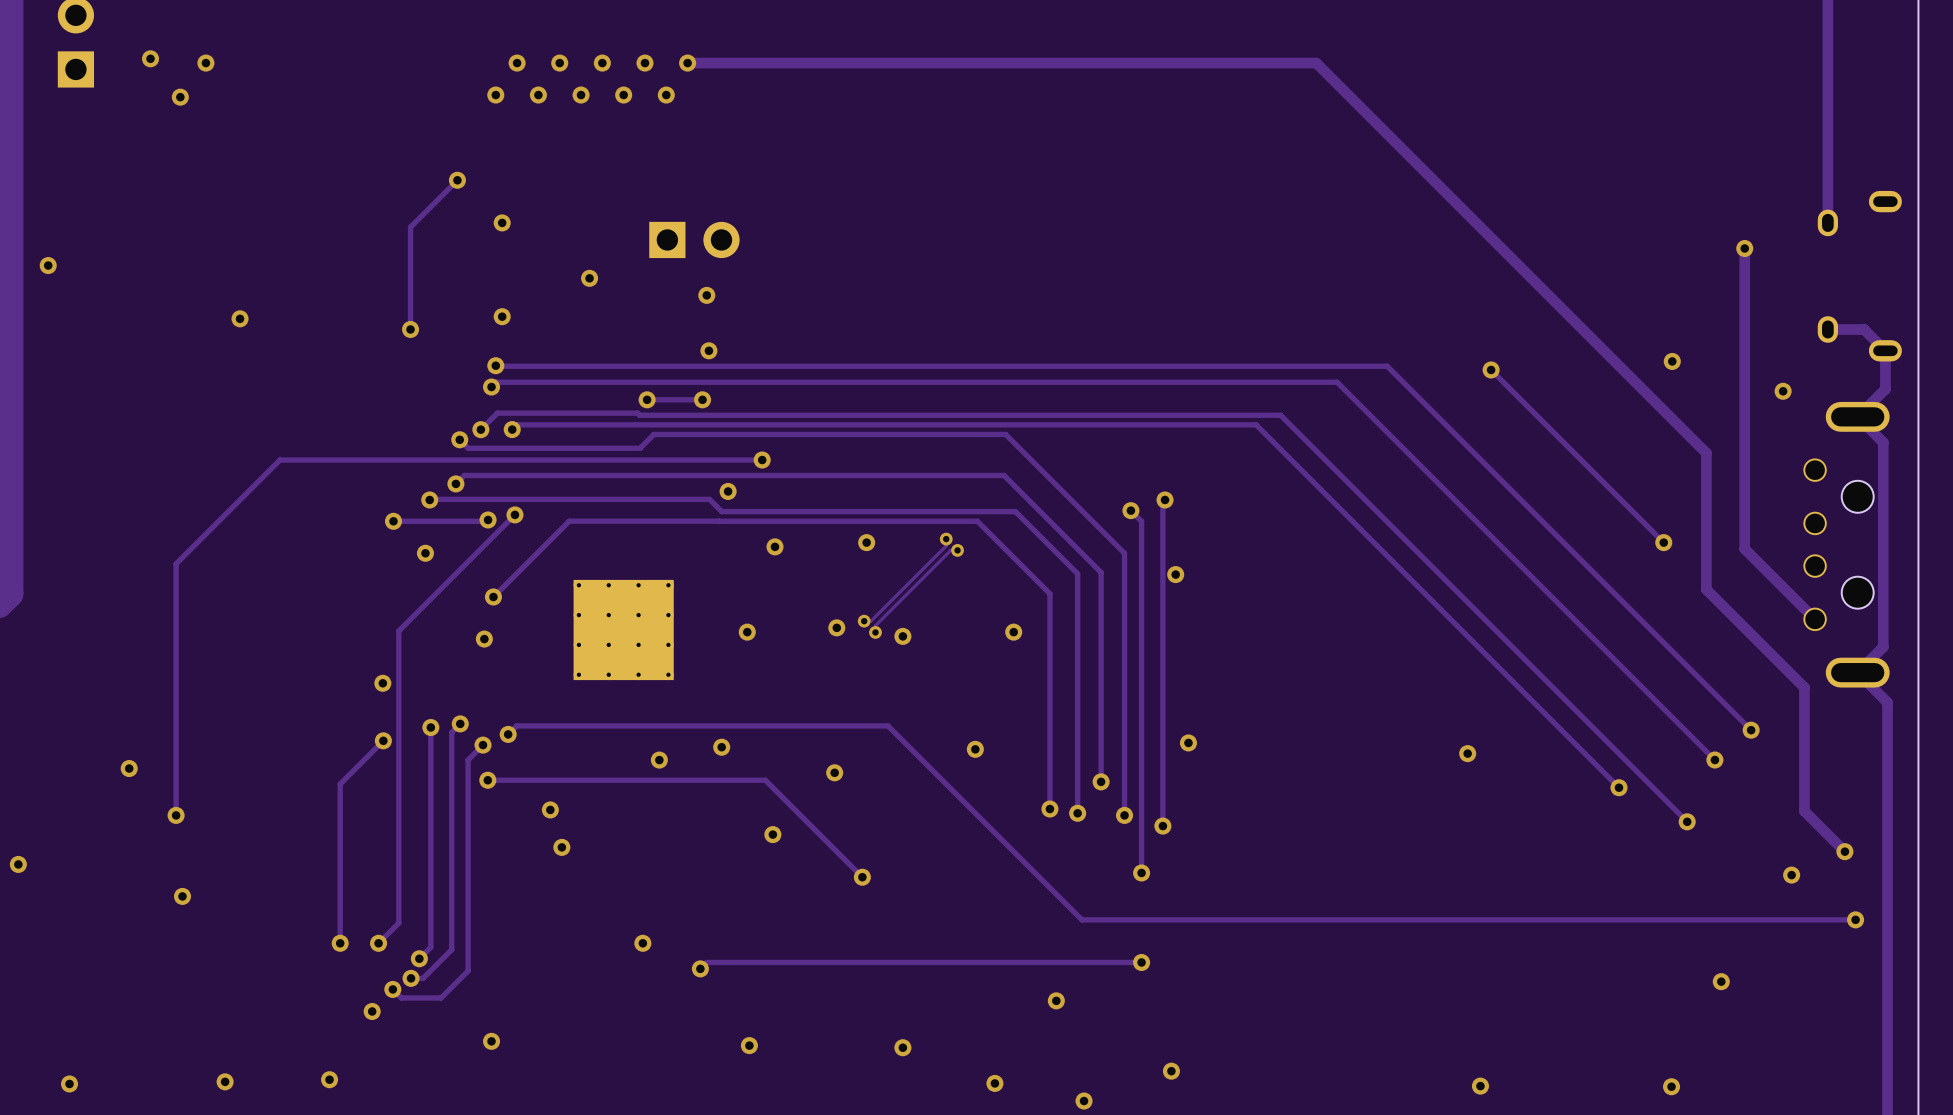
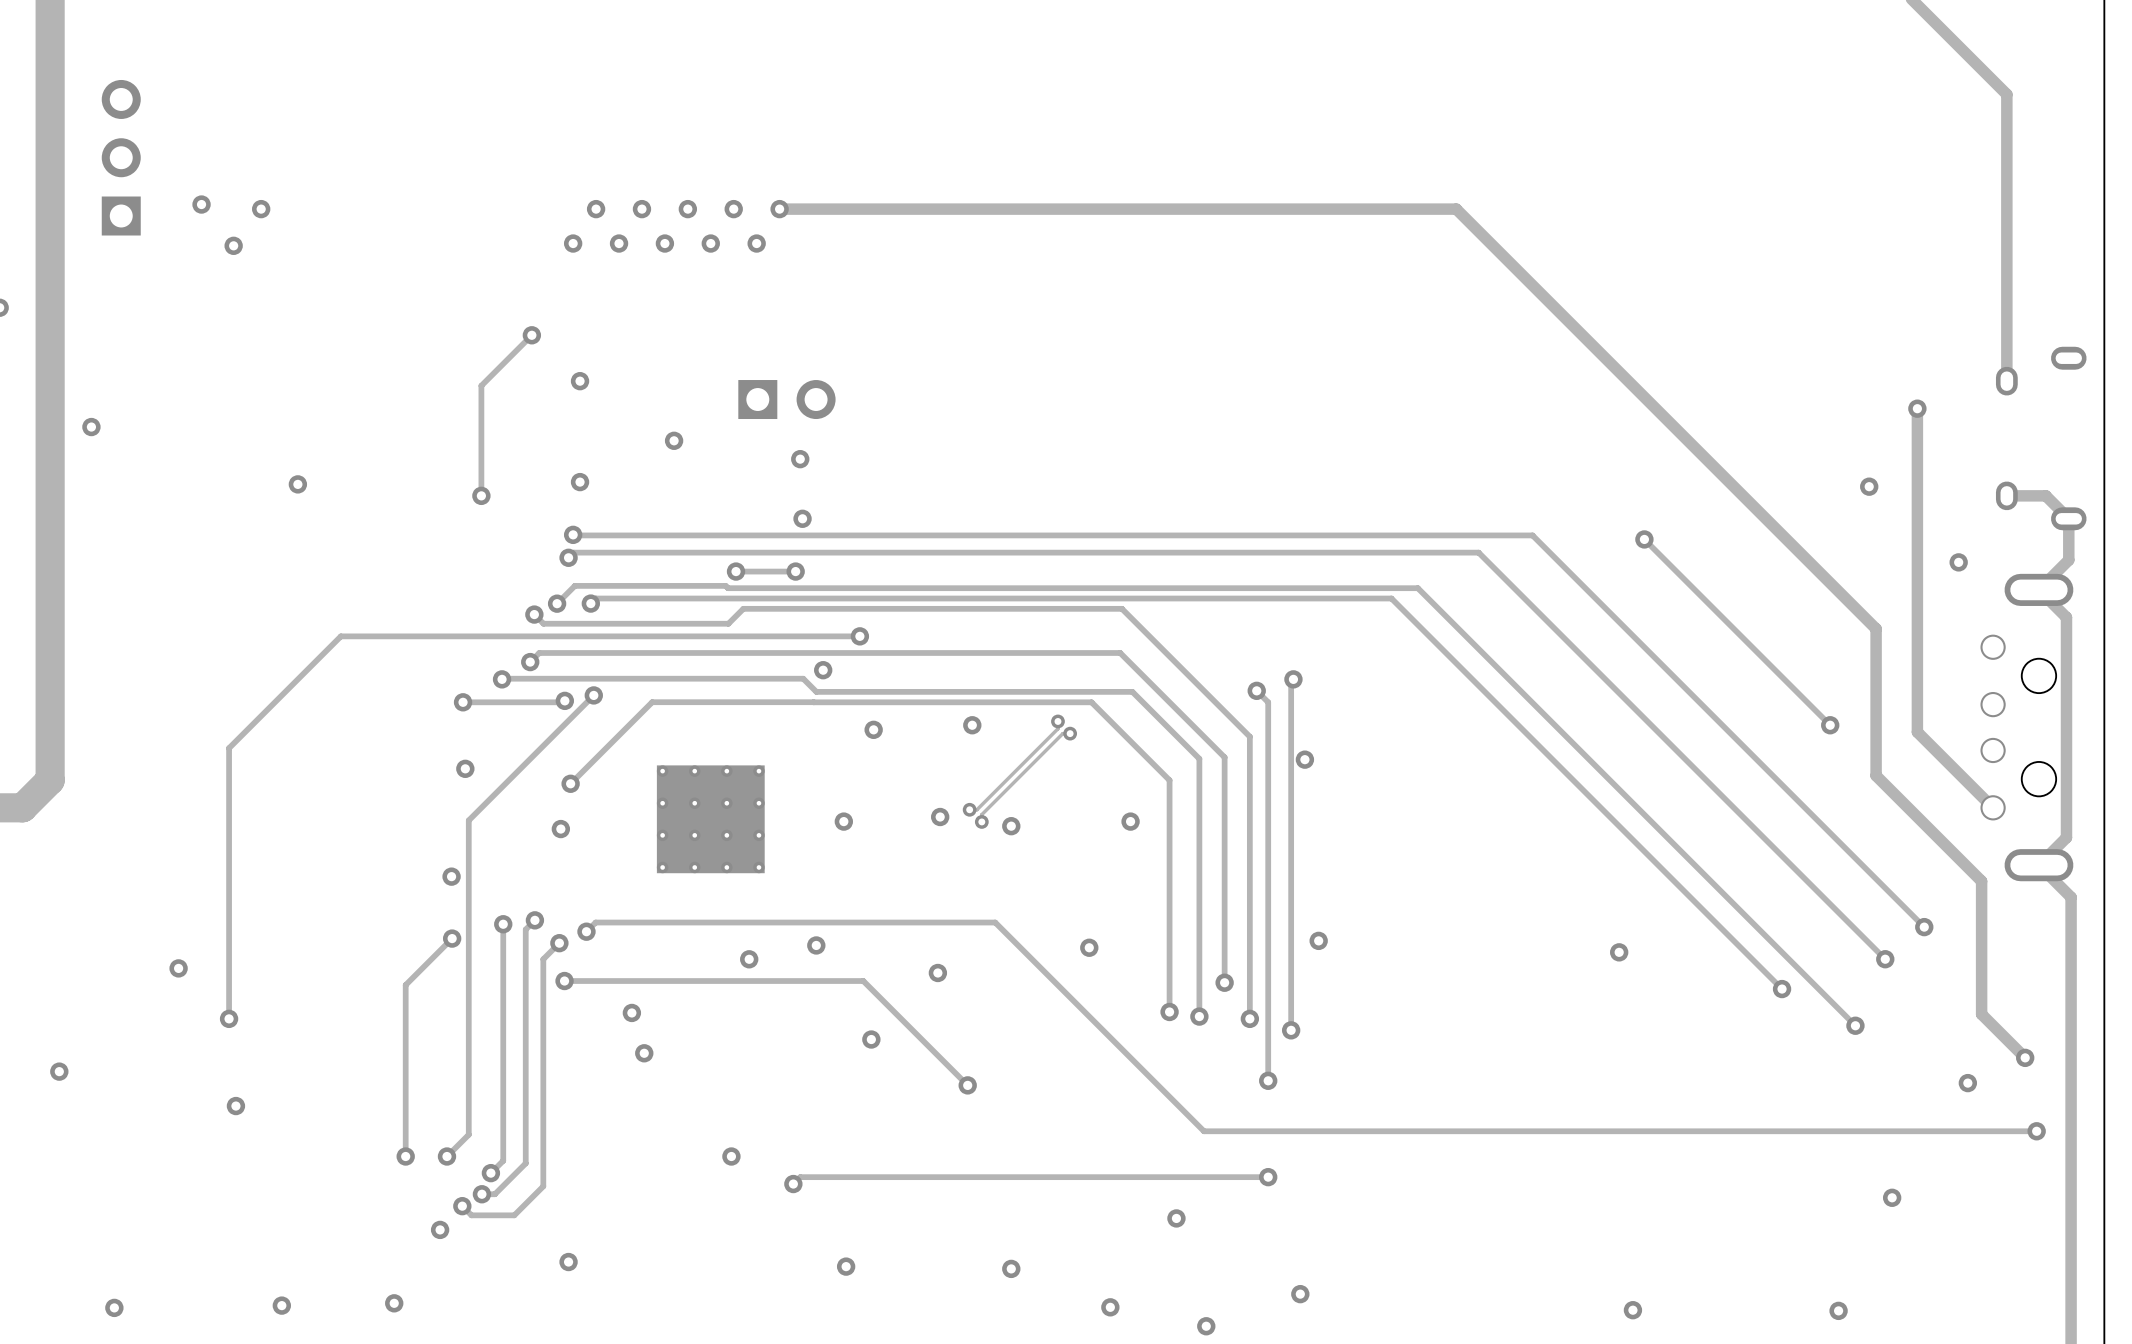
via position: (1672, 361) -> (1869, 486)
via position: (425, 553) -> (465, 768)

